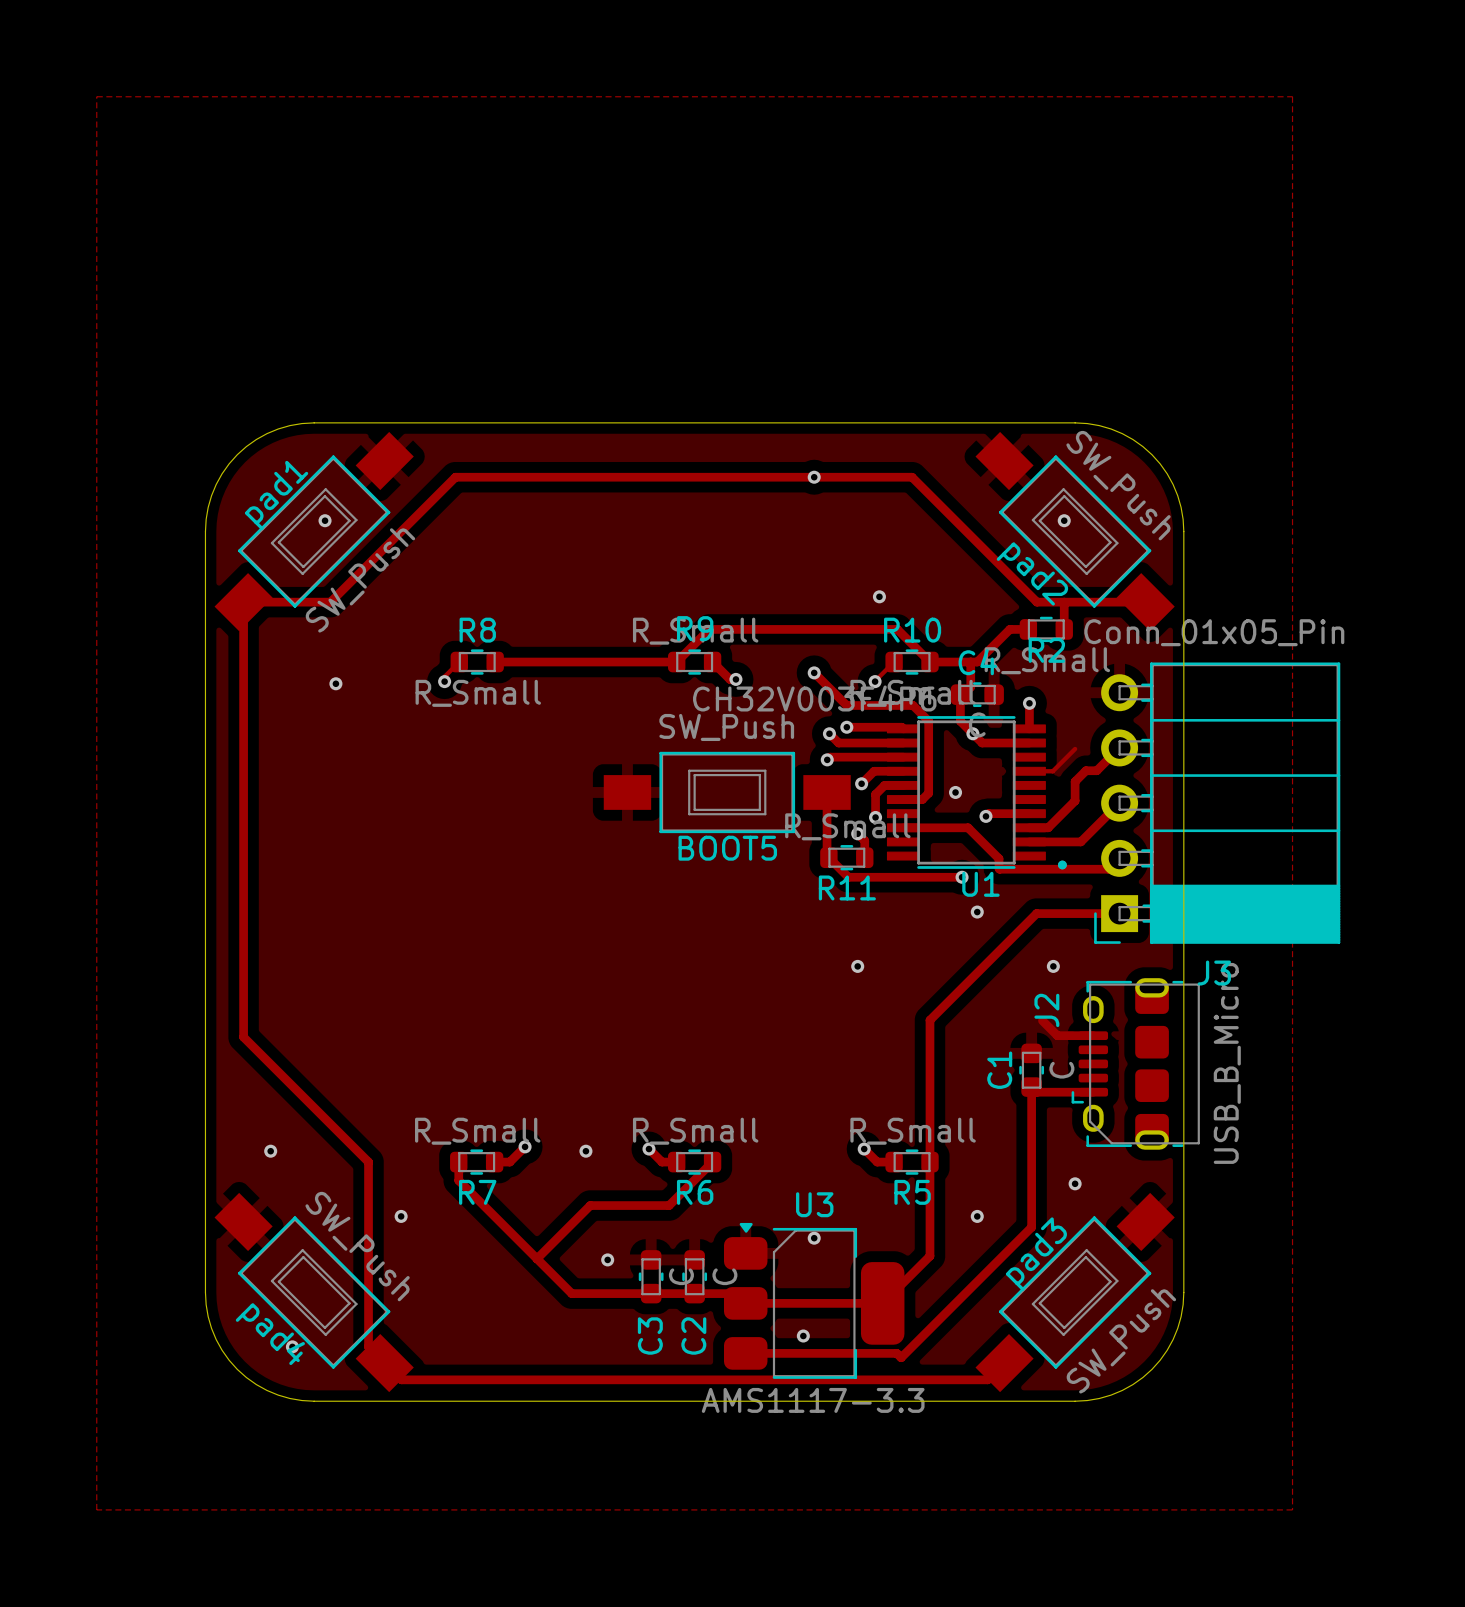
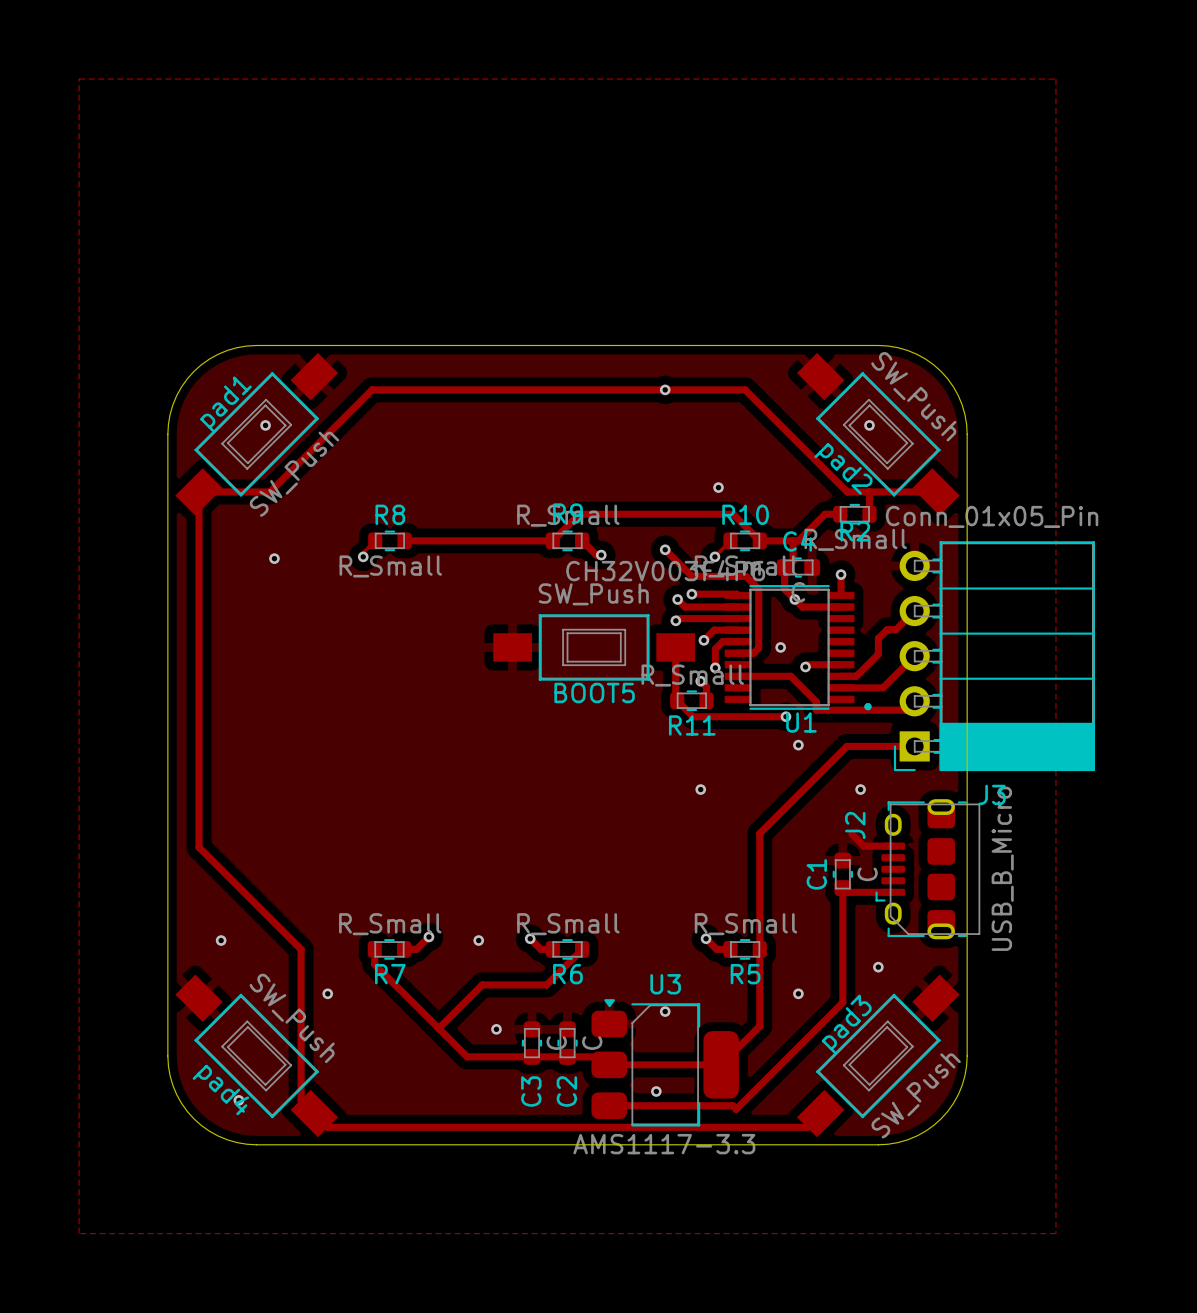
track: (1075, 748) (1052, 771) (1029, 771) -> none

